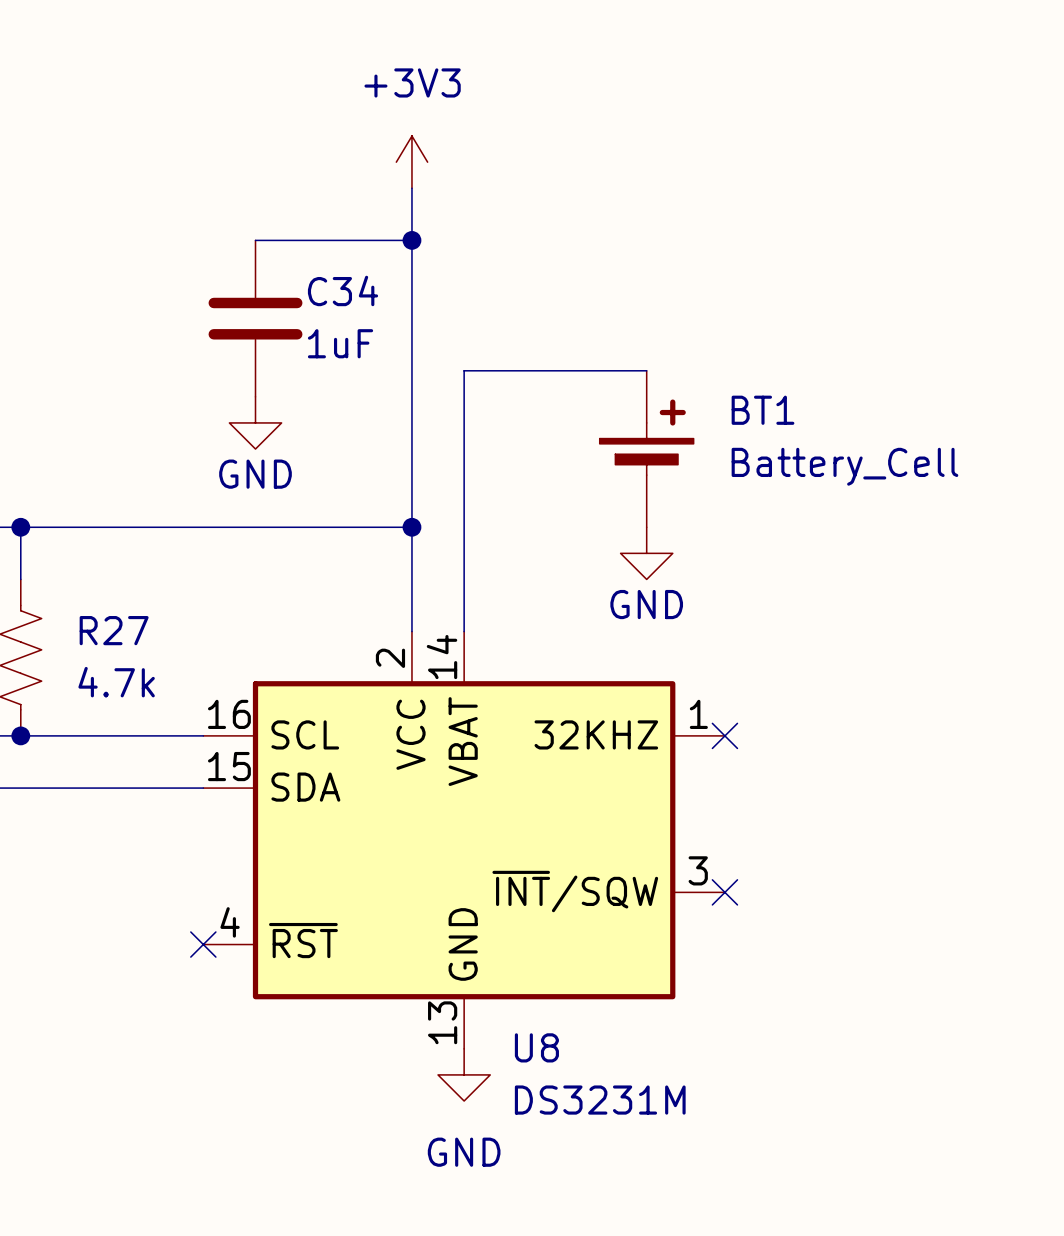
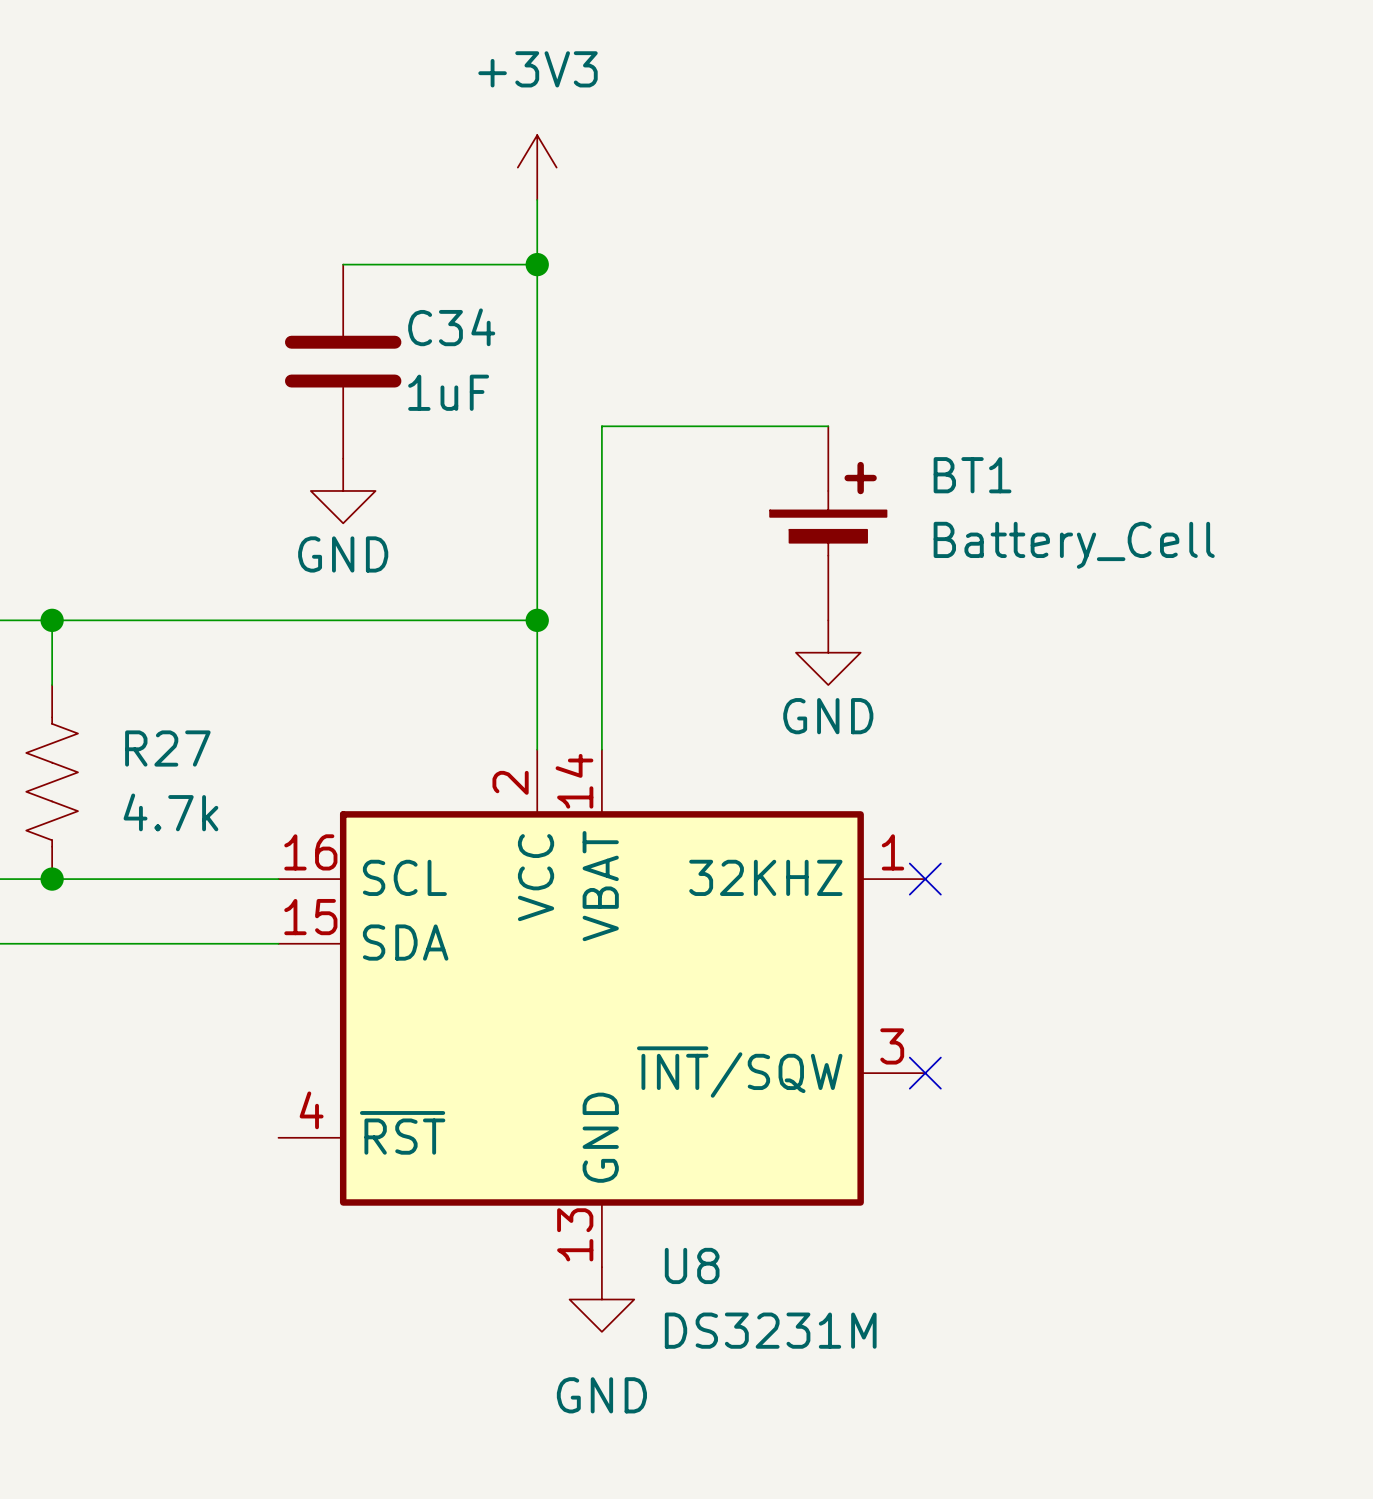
no-connect mark: (203, 944) -> none

